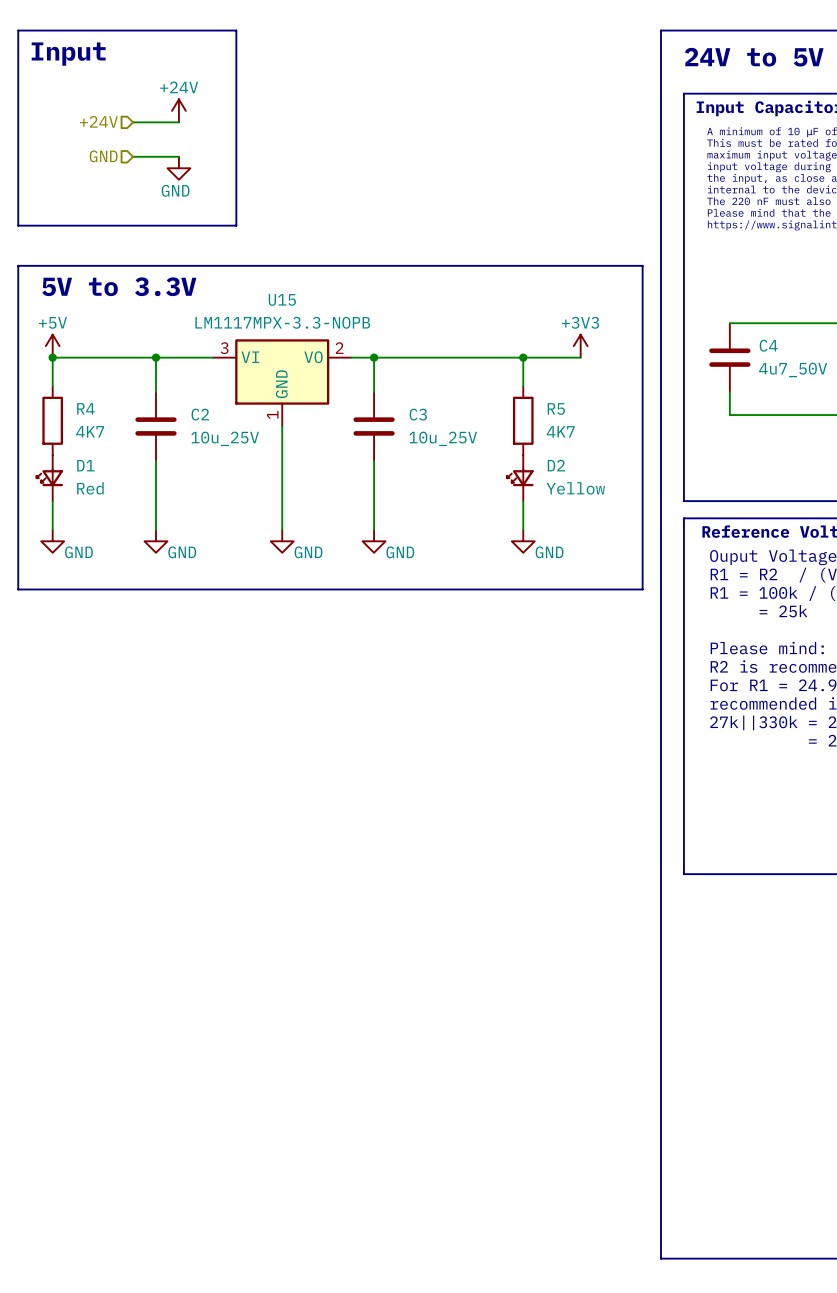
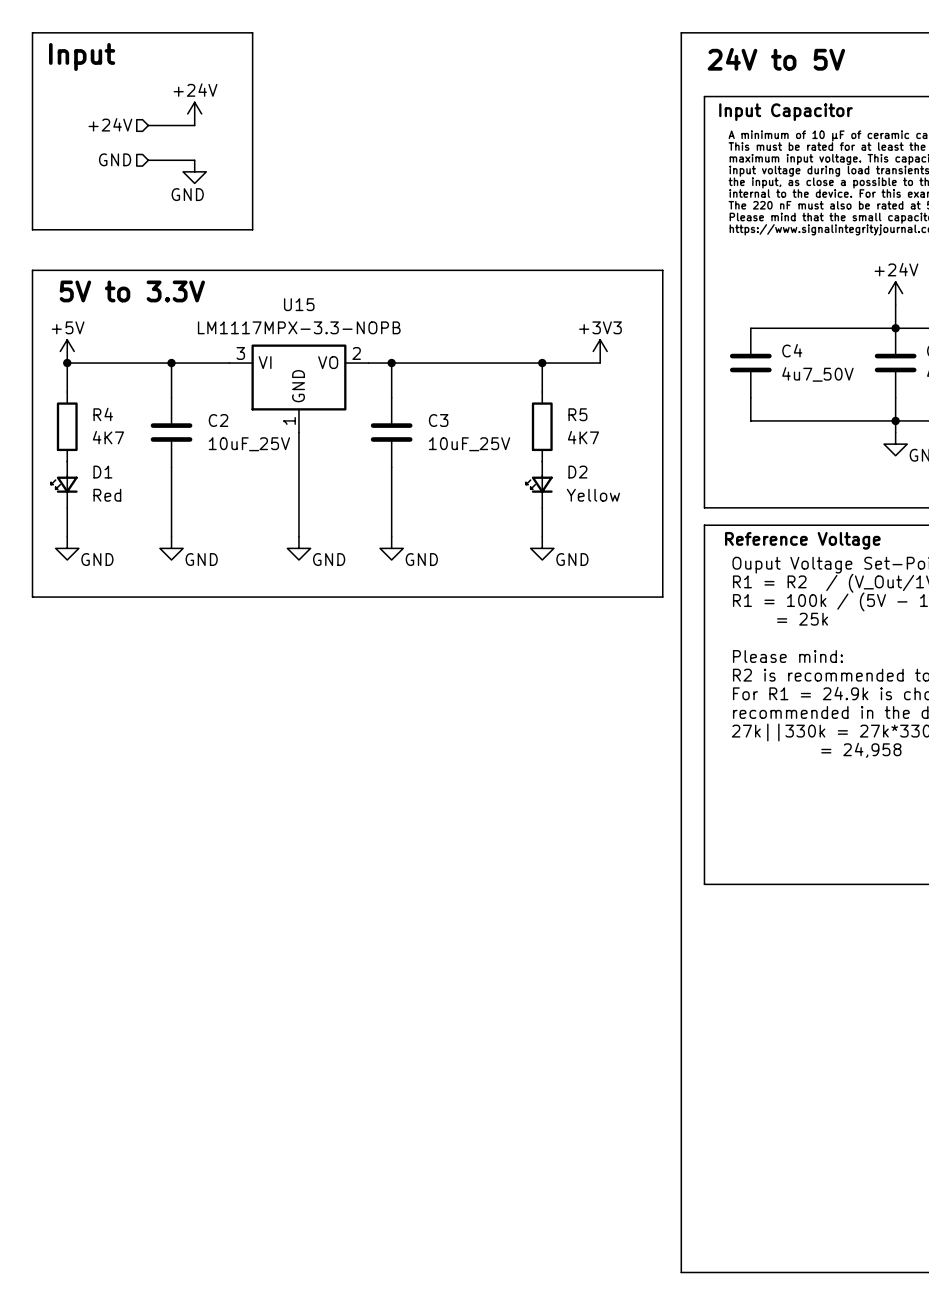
C2 value: 10u_25V (225, 438) -> 10uF_25V (249, 444)
C3 value: 10u_25V (443, 438) -> 10uF_25V (469, 444)

